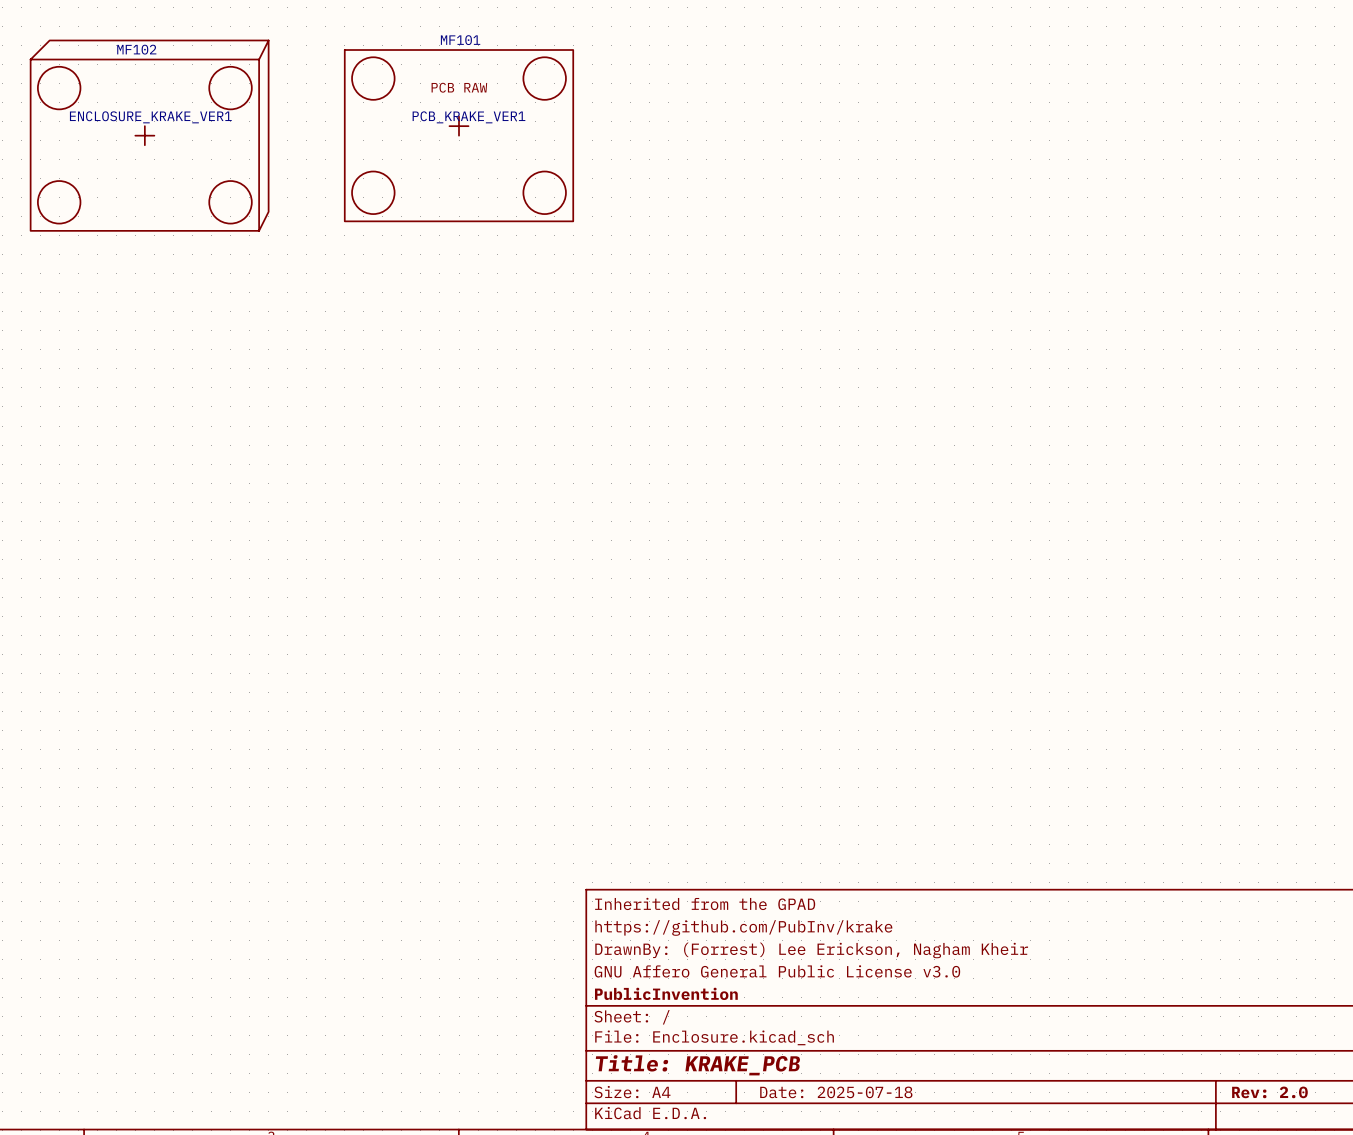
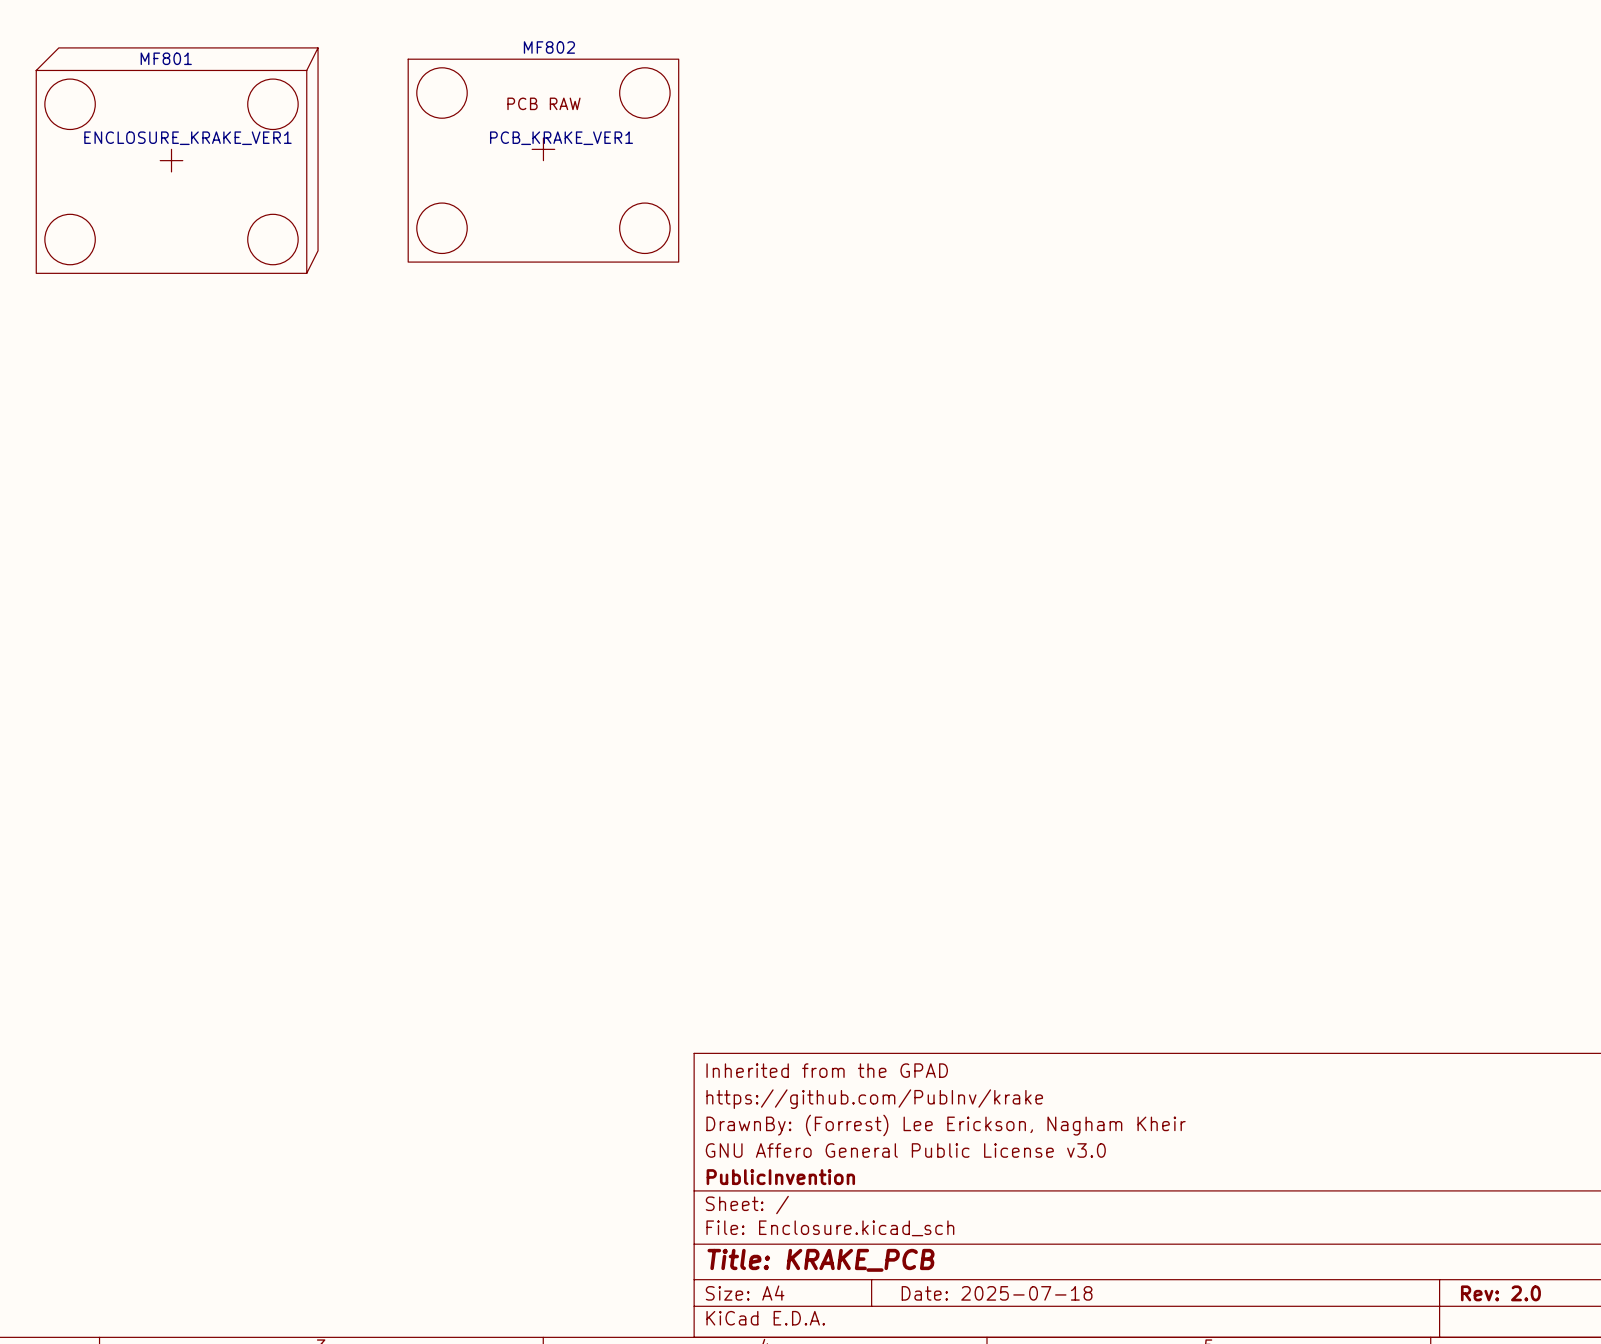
MF101 name: MF101 (460, 40) -> MF802 (549, 47)
MF102 name: MF102 (136, 49) -> MF801 (166, 58)

